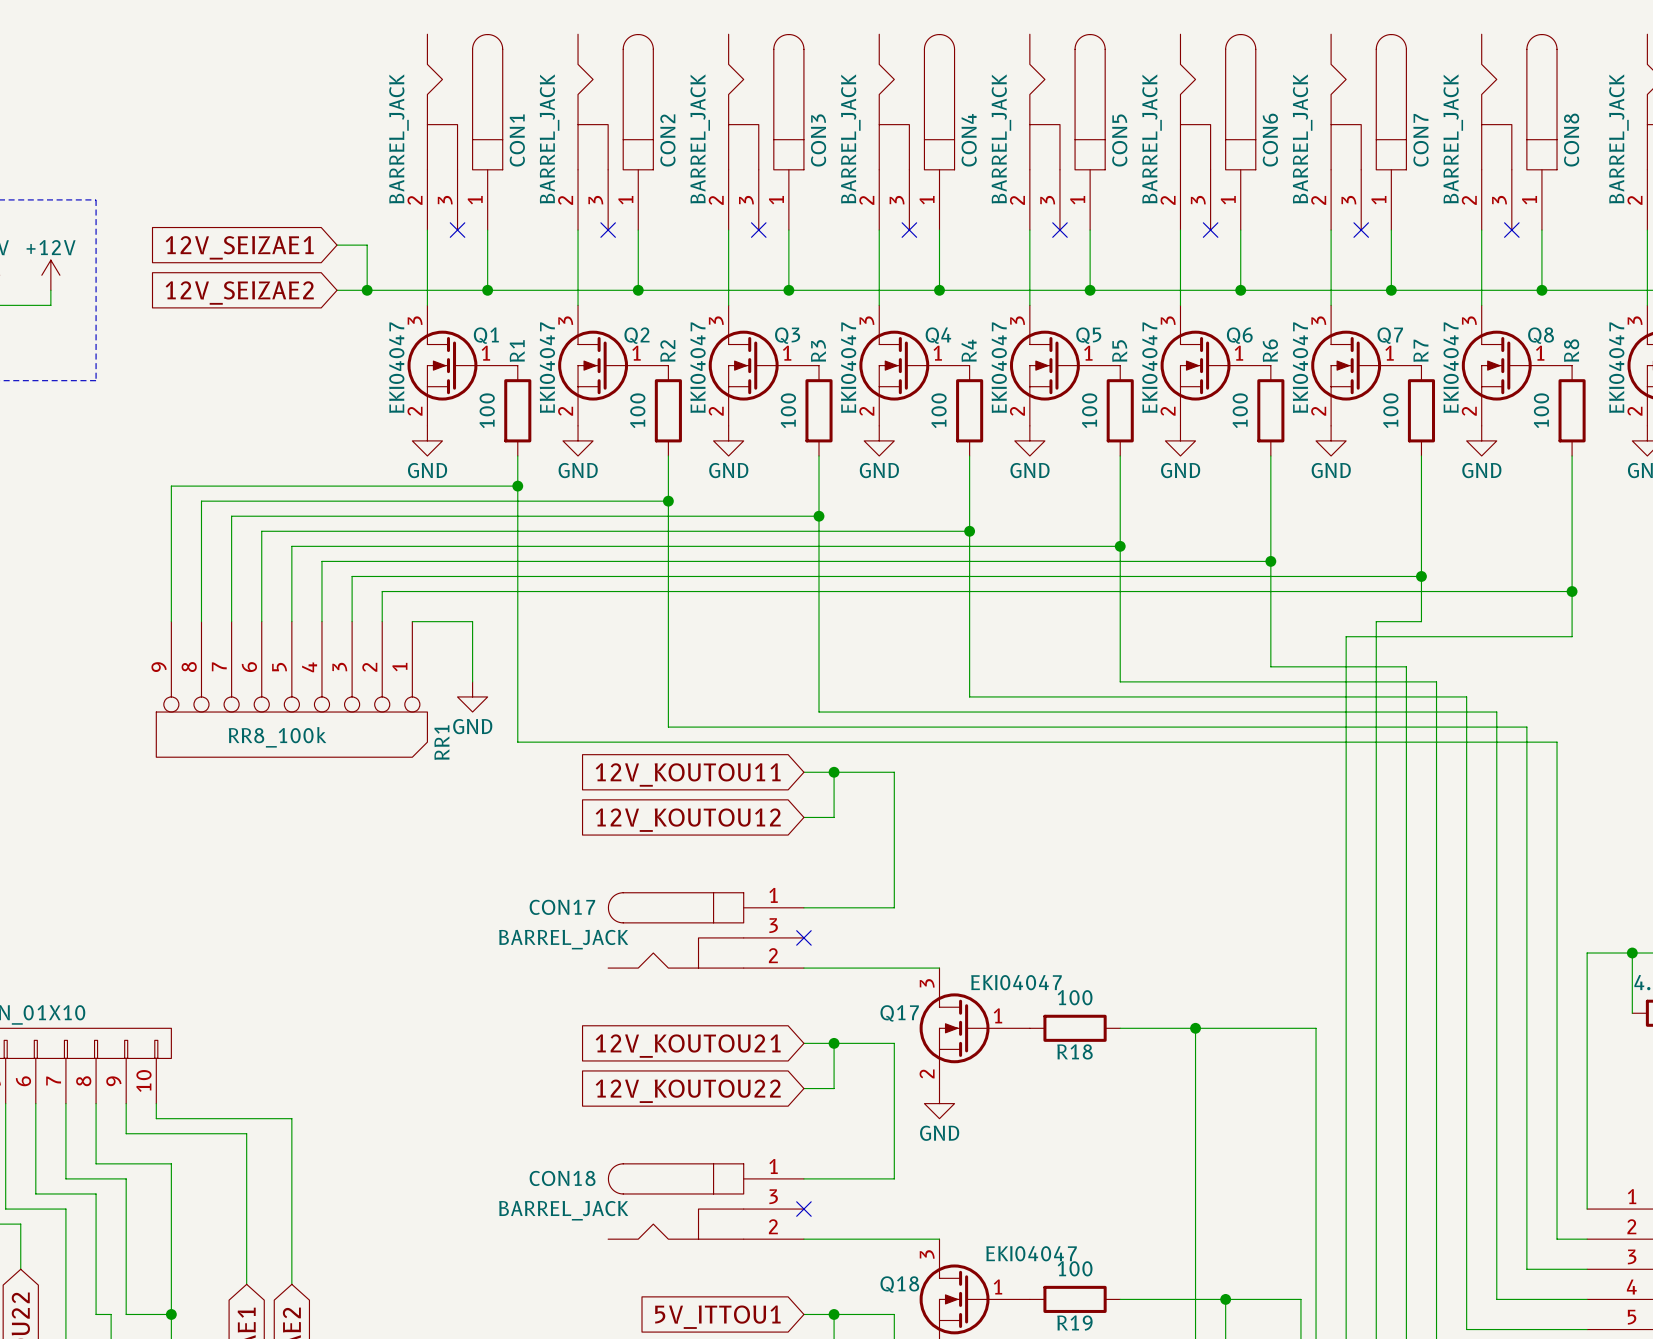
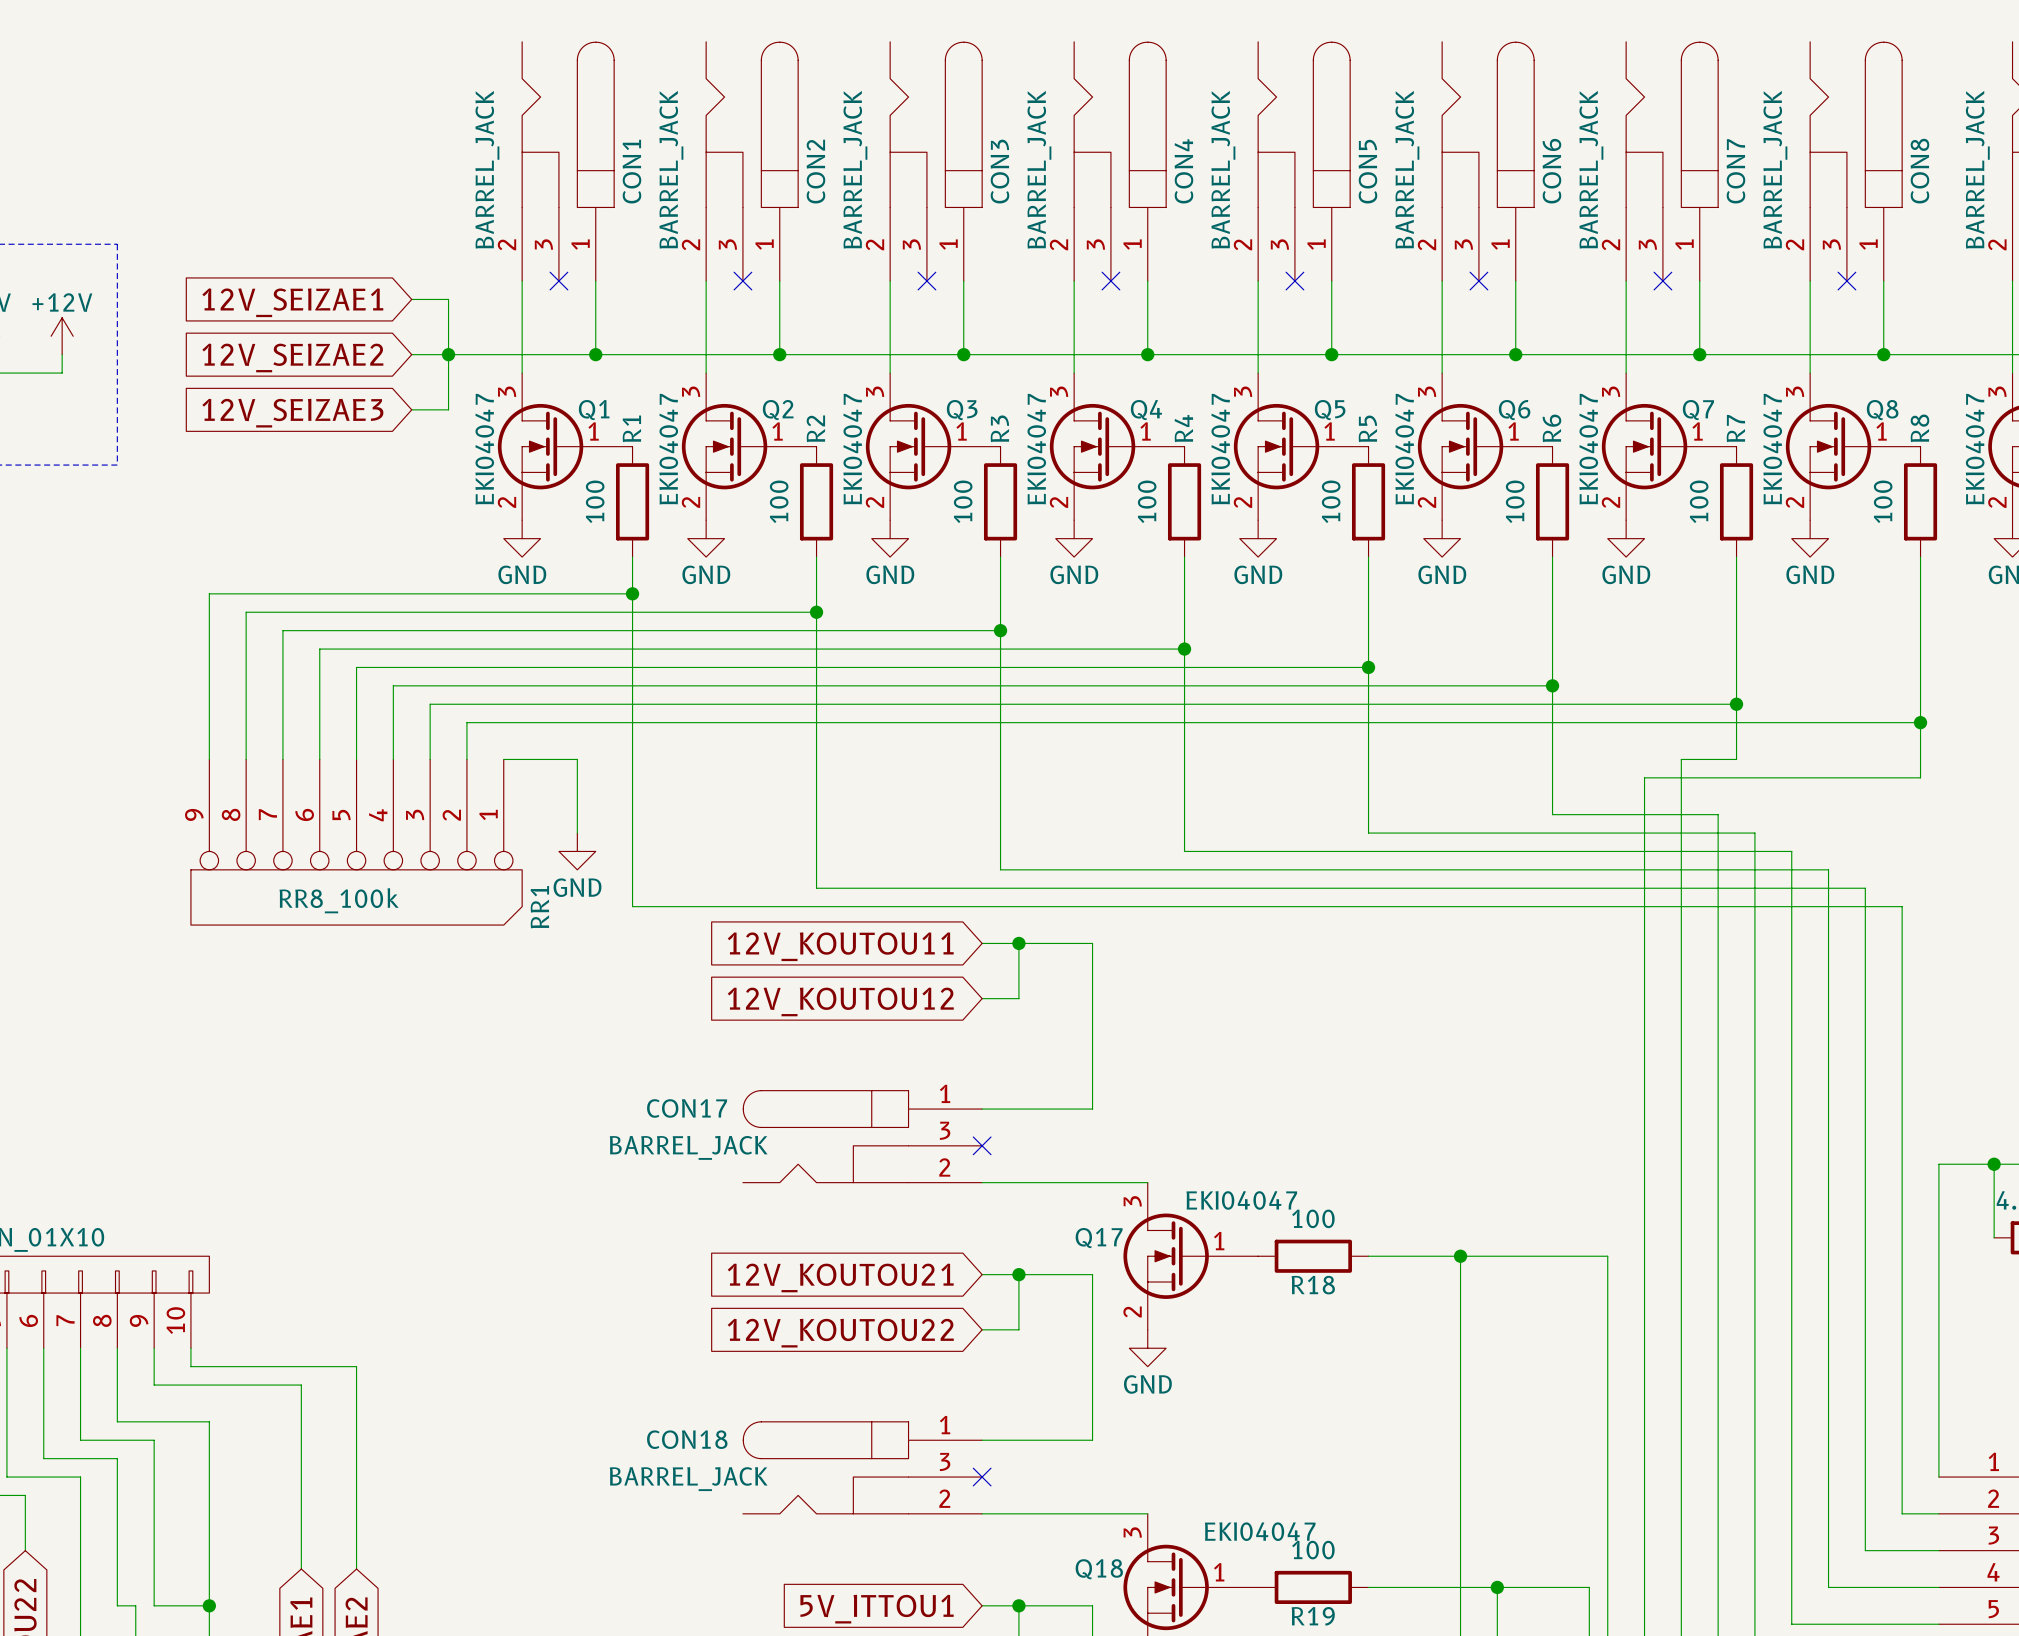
wire: none -> (448, 354) (448, 409) (411, 409)
global label: none -> 12V_SEIZAE3 (292, 413)

